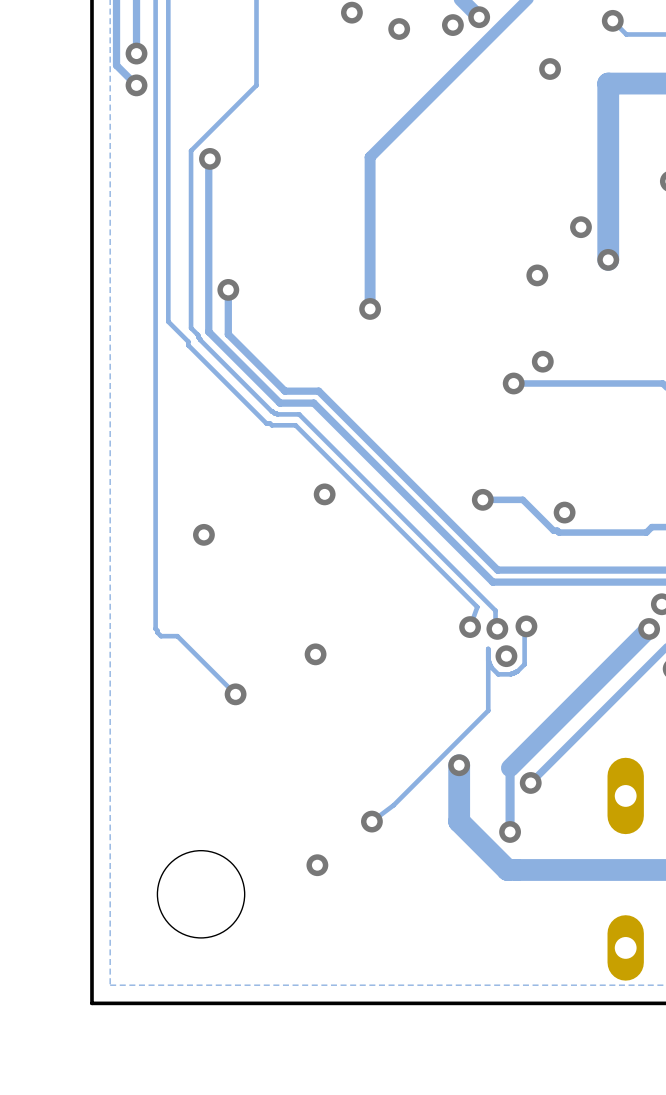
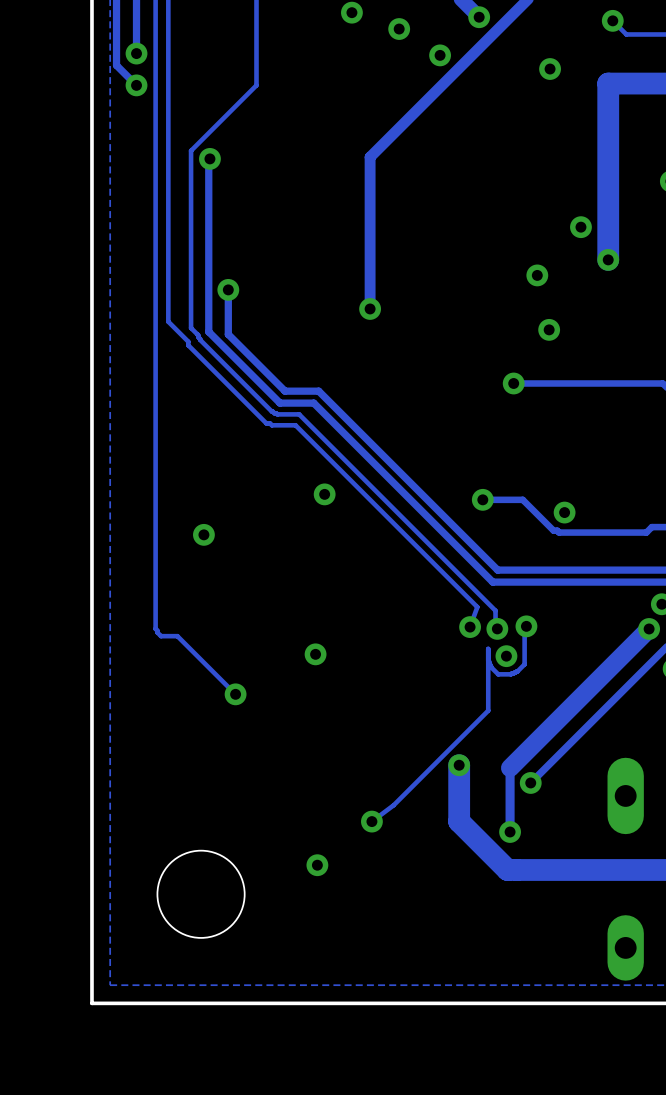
via position: (452, 25) -> (440, 55)
via position: (542, 361) -> (549, 329)

